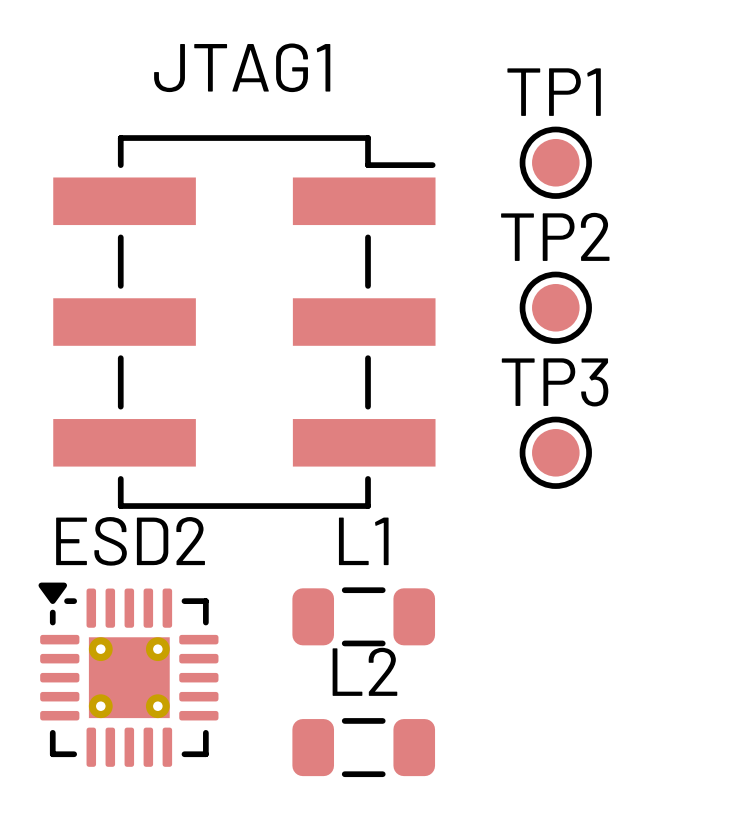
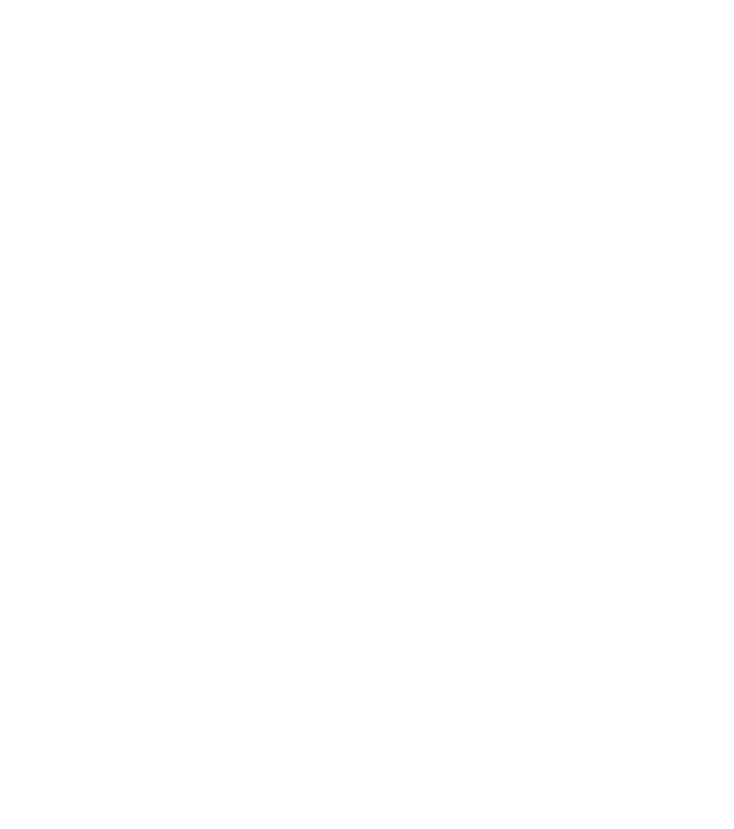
TP1: (555, 162) -> none
TP2: (555, 307) -> none
JTAG1: (244, 322) -> none
TP3: (555, 452) -> none
L1: (363, 616) -> none
ESD2: (128, 674) -> none
L2: (363, 747) -> none

